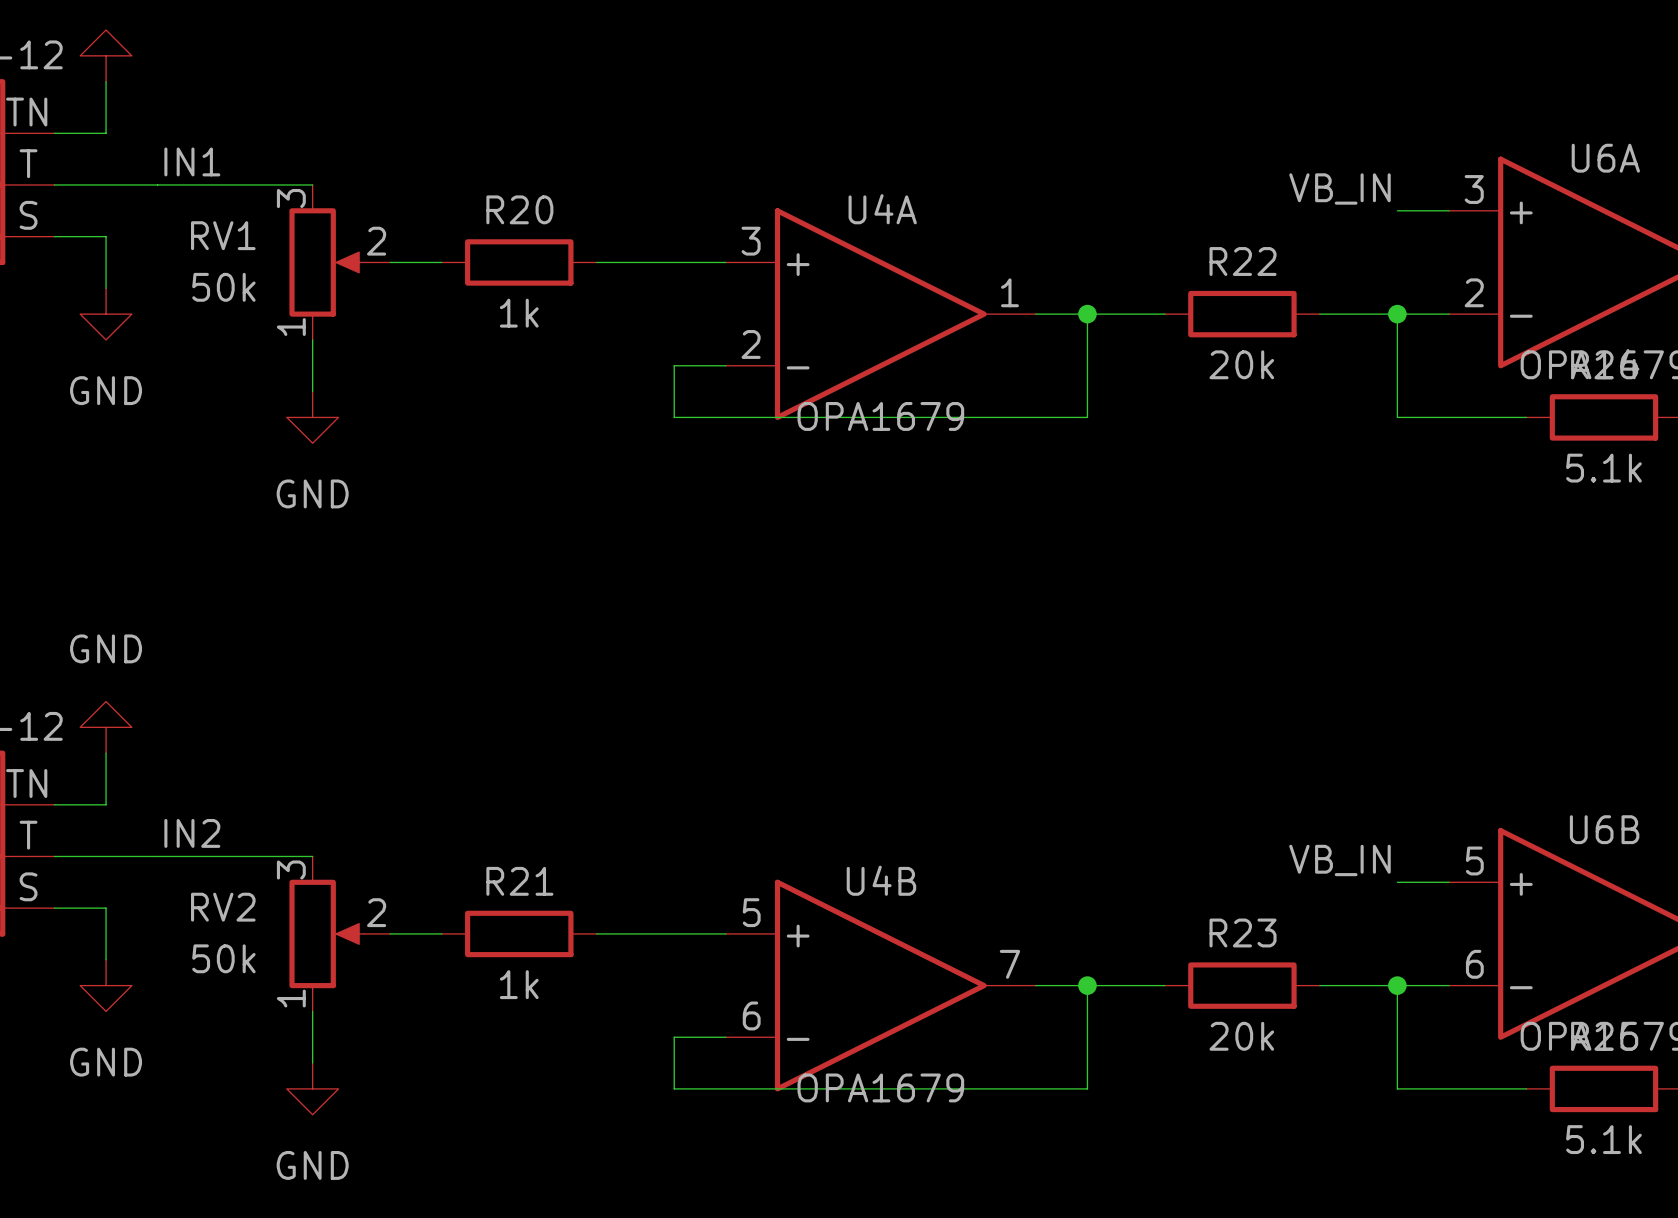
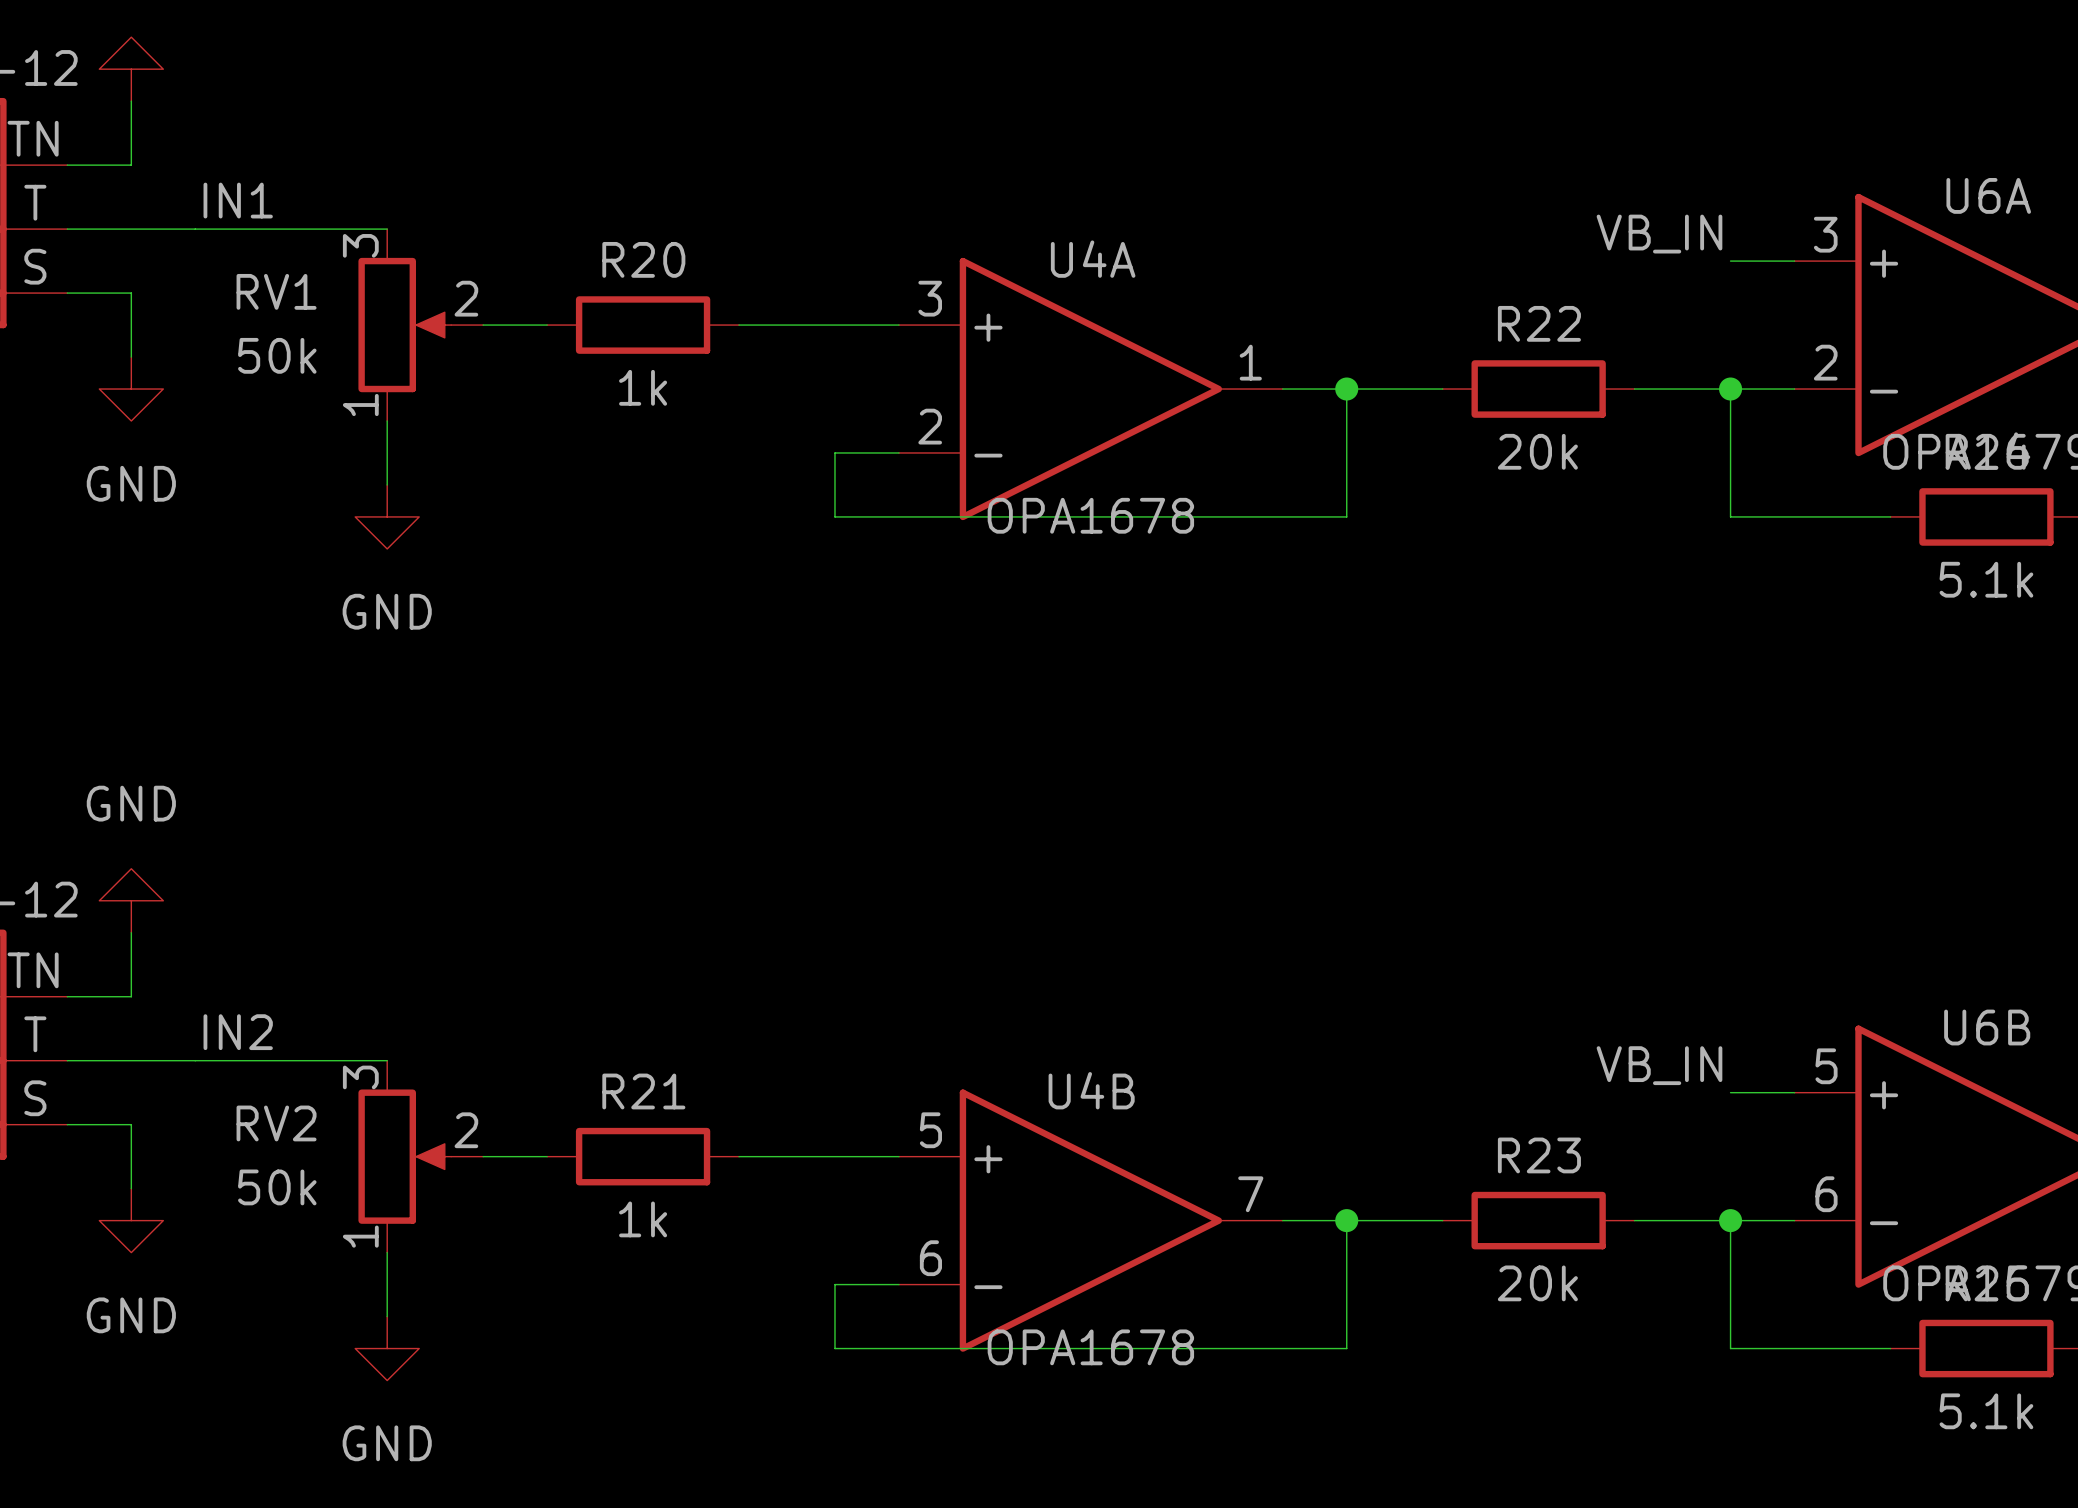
U4A value: OPA1679 (880, 416) -> OPA1678 (1090, 515)
U4B value: OPA1679 (880, 1087) -> OPA1678 (1090, 1347)

